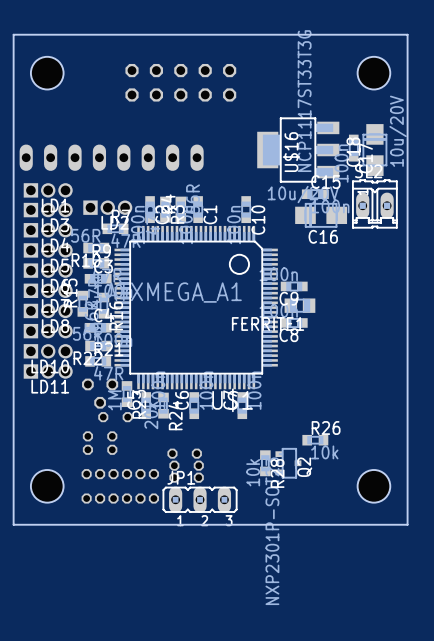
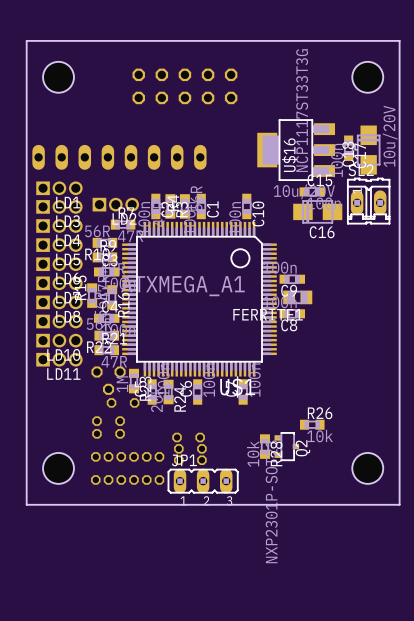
Q2 footprint: [275, 447, 302, 479] -> [274, 432, 300, 462]

